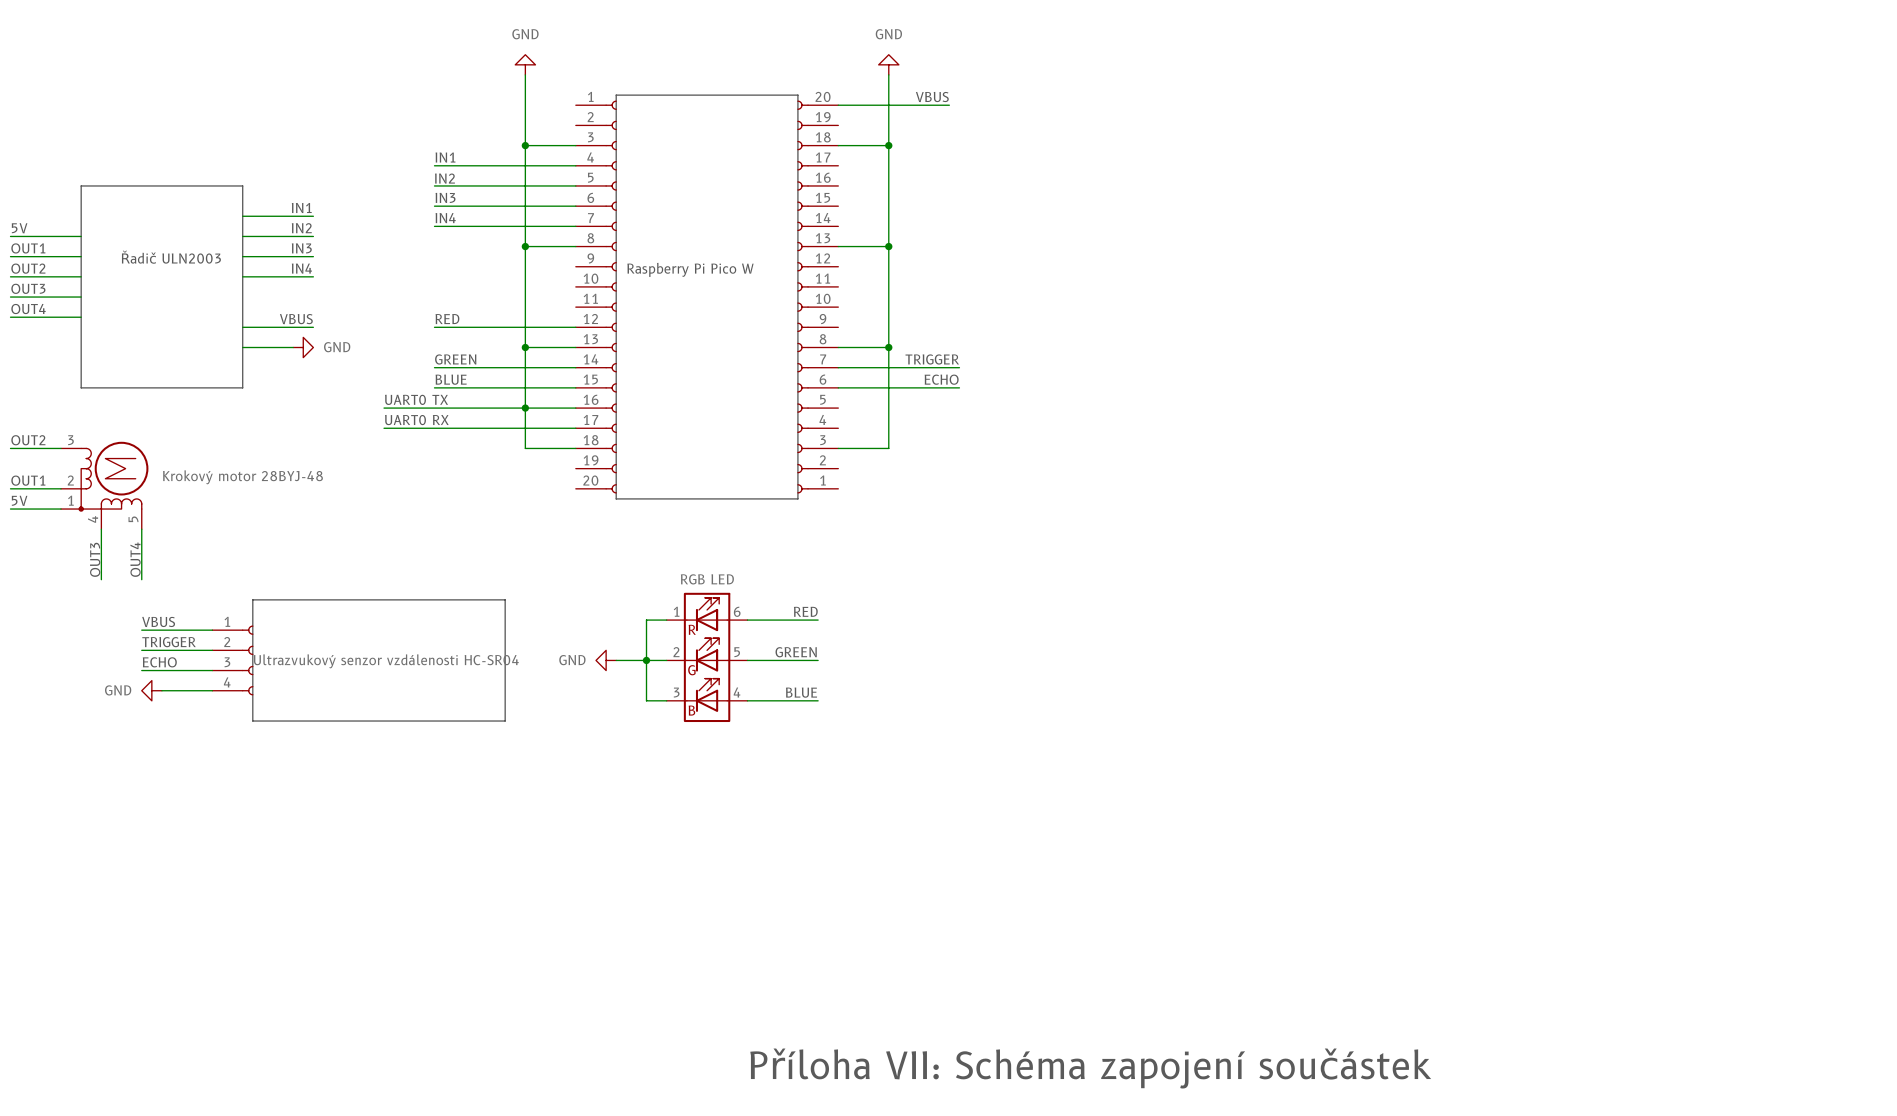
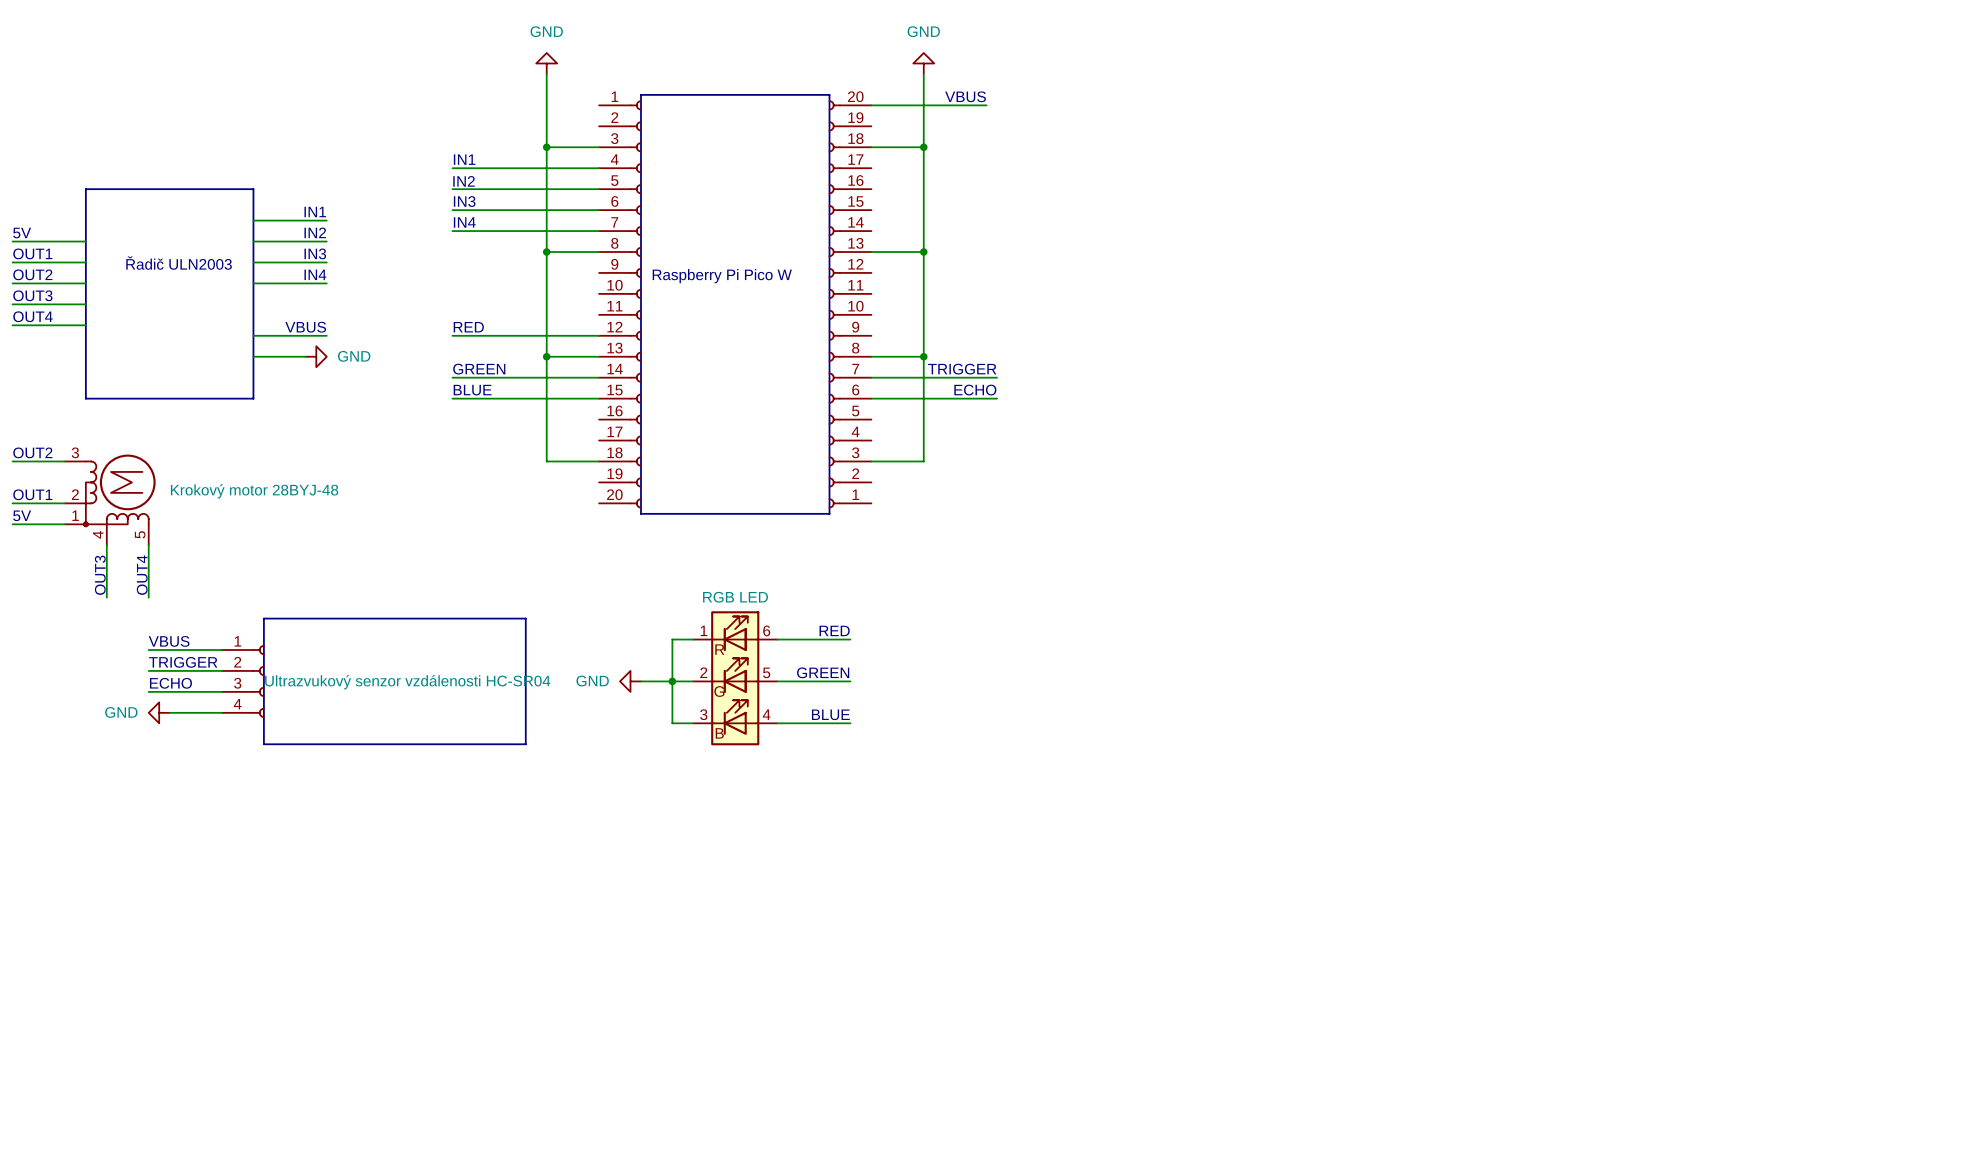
text: UART0 TX (416, 399) -> none
wire: (384, 408) (575, 408) -> none
junction: (525, 408) -> none
text: UART0 RX (416, 420) -> none
wire: (384, 428) (575, 428) -> none
text: Příloha VII: Schéma zapojení součástek (1090, 1068) -> none

